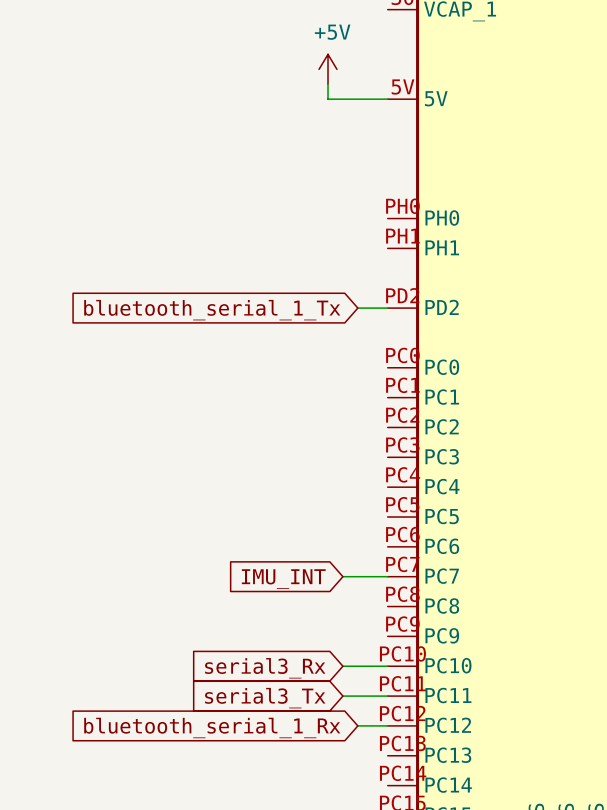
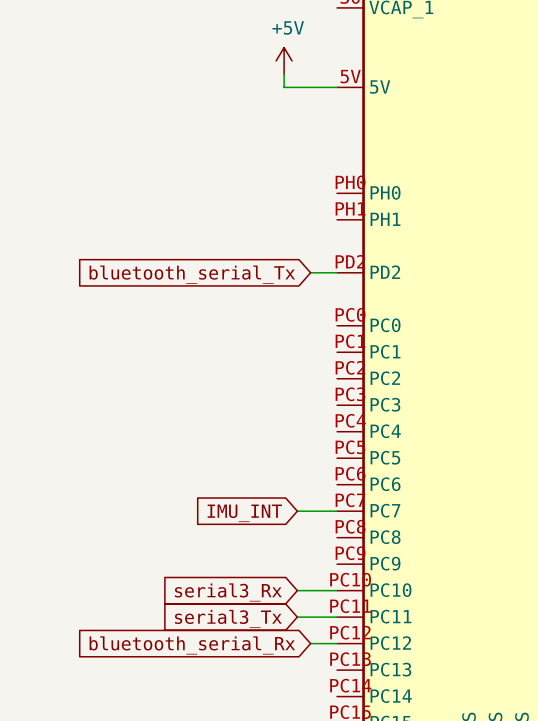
global label: bluetooth_serial_1_Tx (212, 310) -> bluetooth_serial_Tx (192, 274)
global label: bluetooth_serial_1_Rx (212, 727) -> bluetooth_serial_Rx (192, 645)

